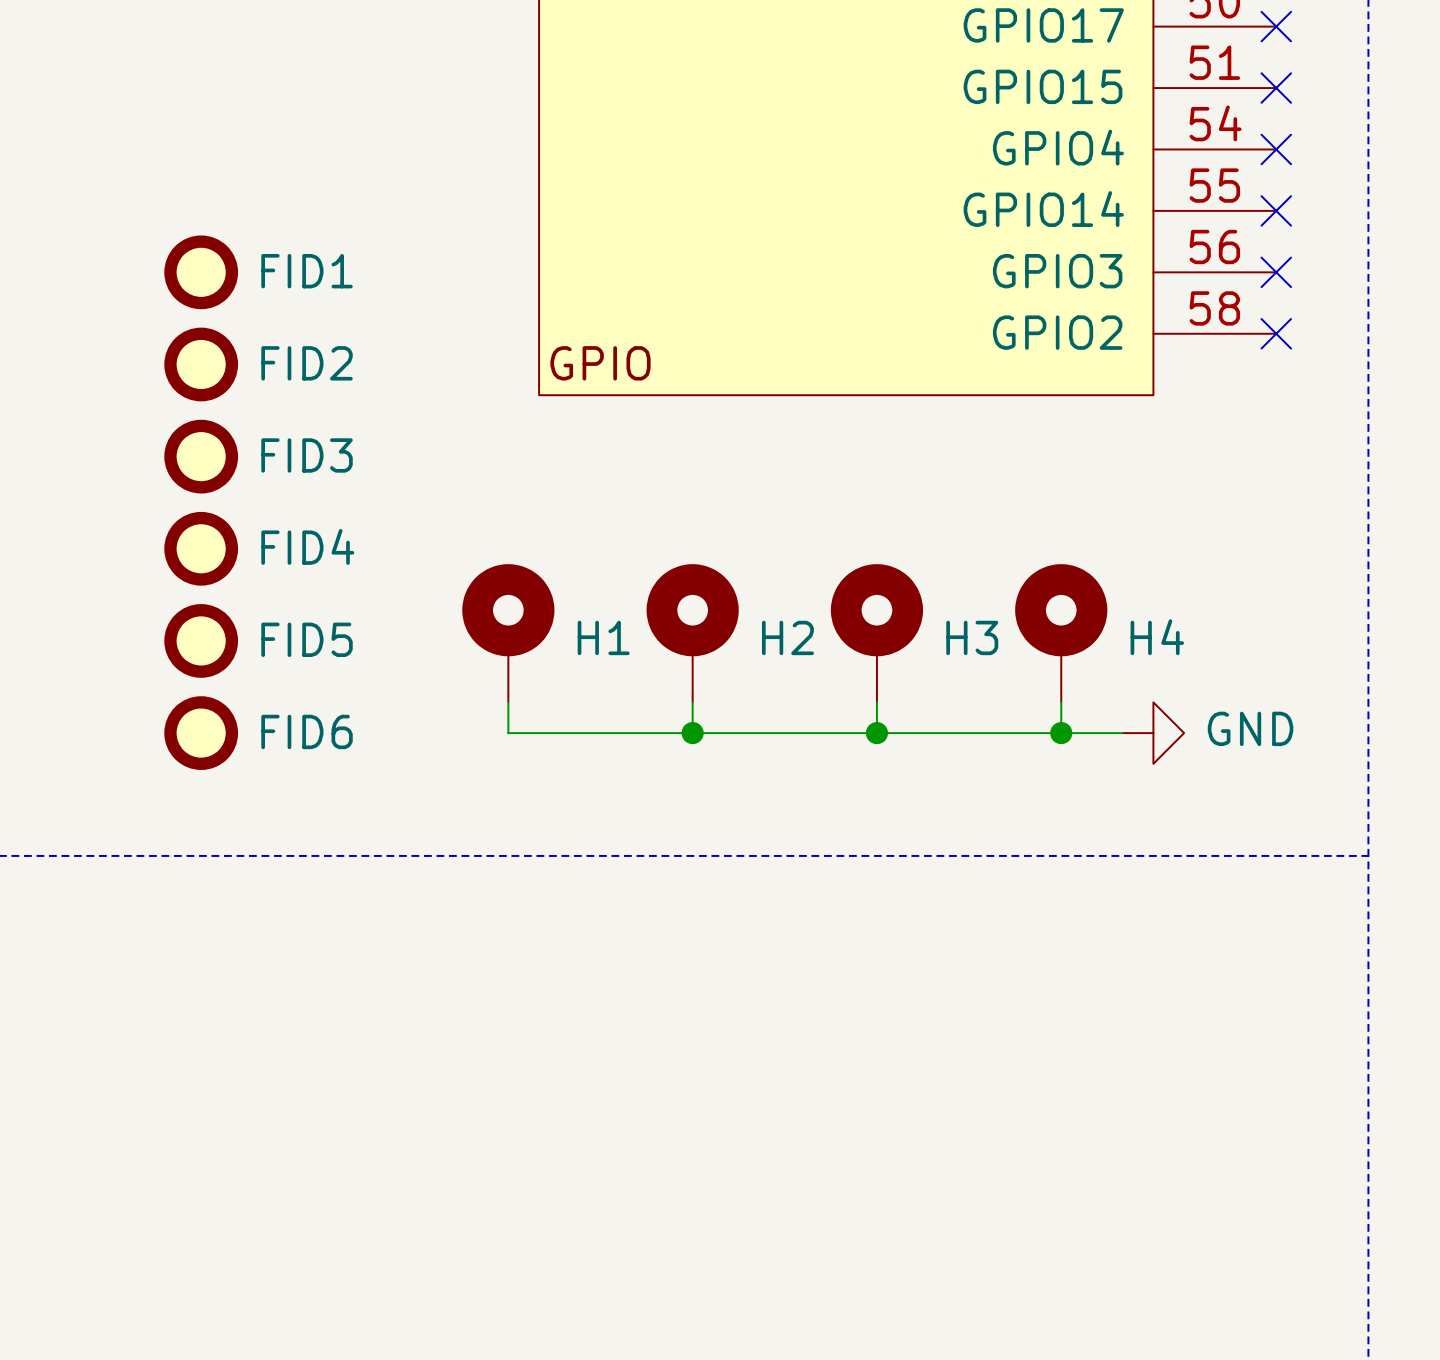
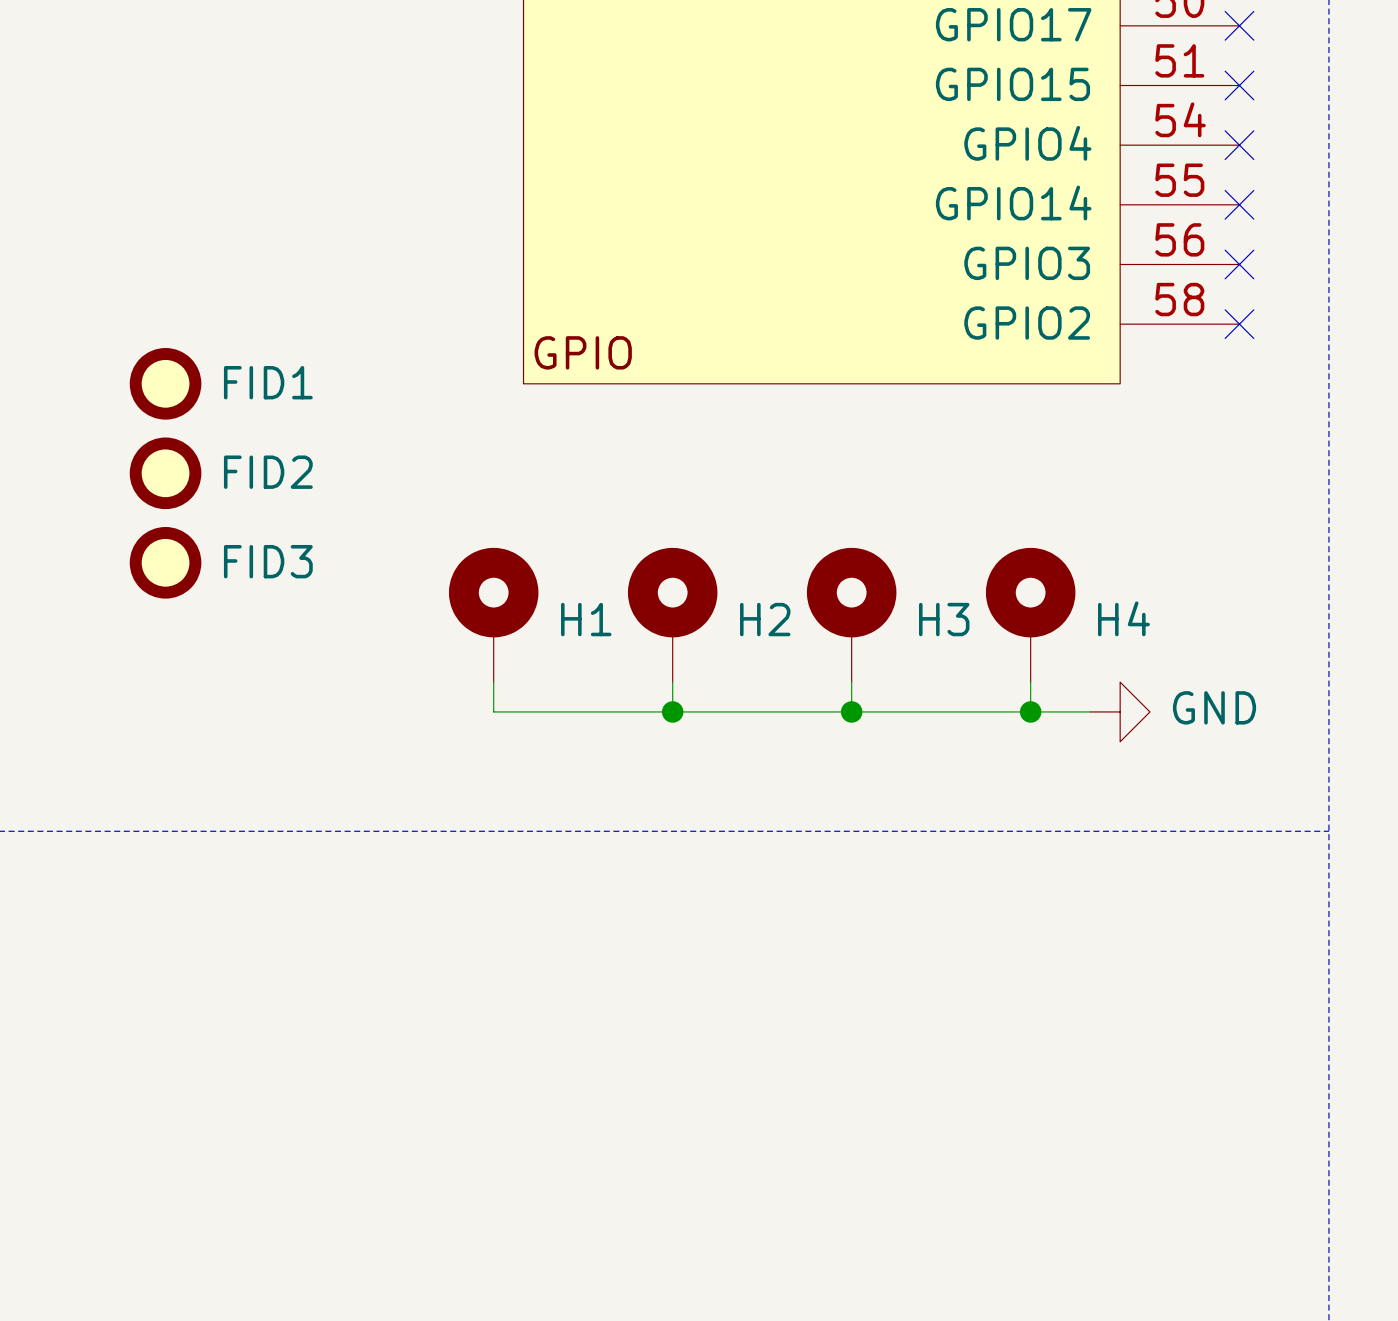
FID1 position: (201, 272) -> (165, 383)
FID2 position: (201, 364) -> (165, 473)
FID3 position: (201, 456) -> (165, 562)
FID4: (201, 548) -> none
FID5: (201, 640) -> none
FID6: (201, 733) -> none

